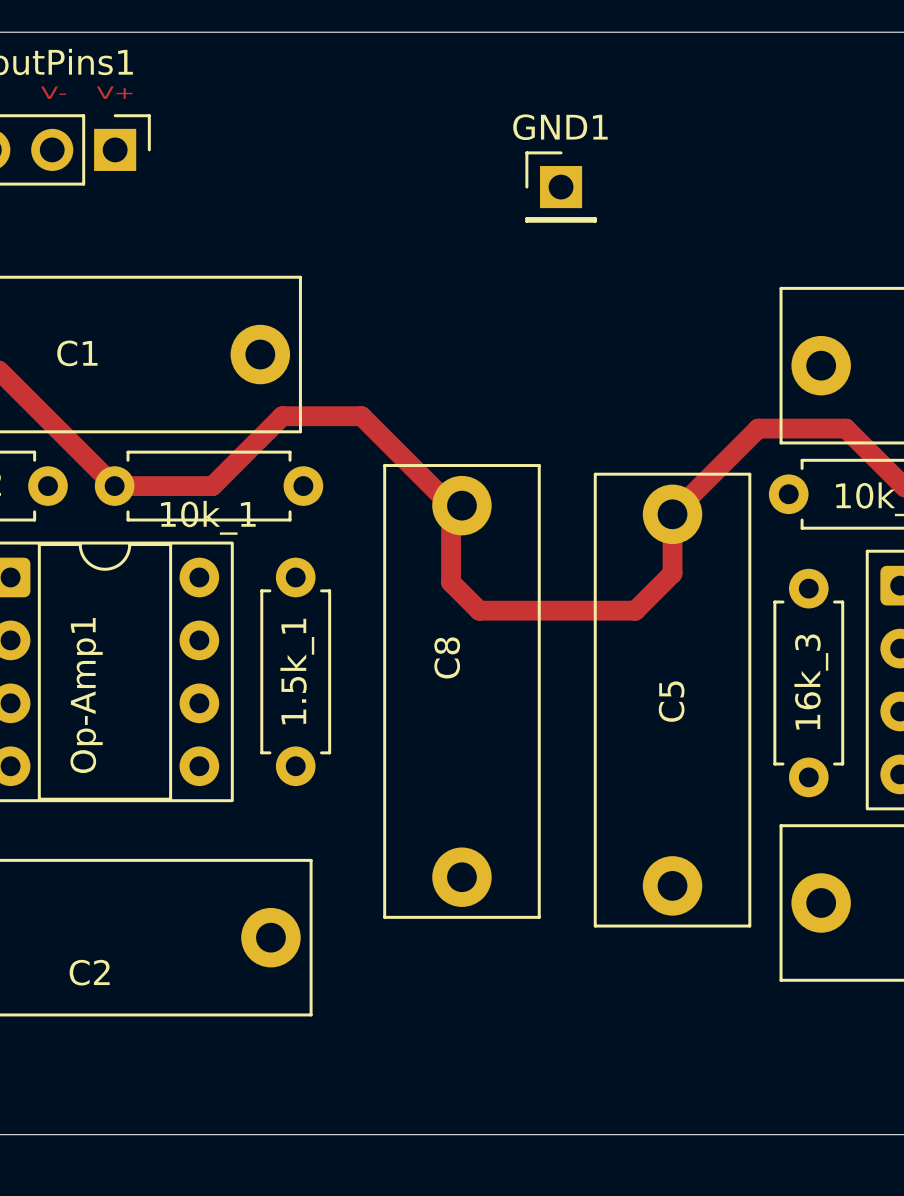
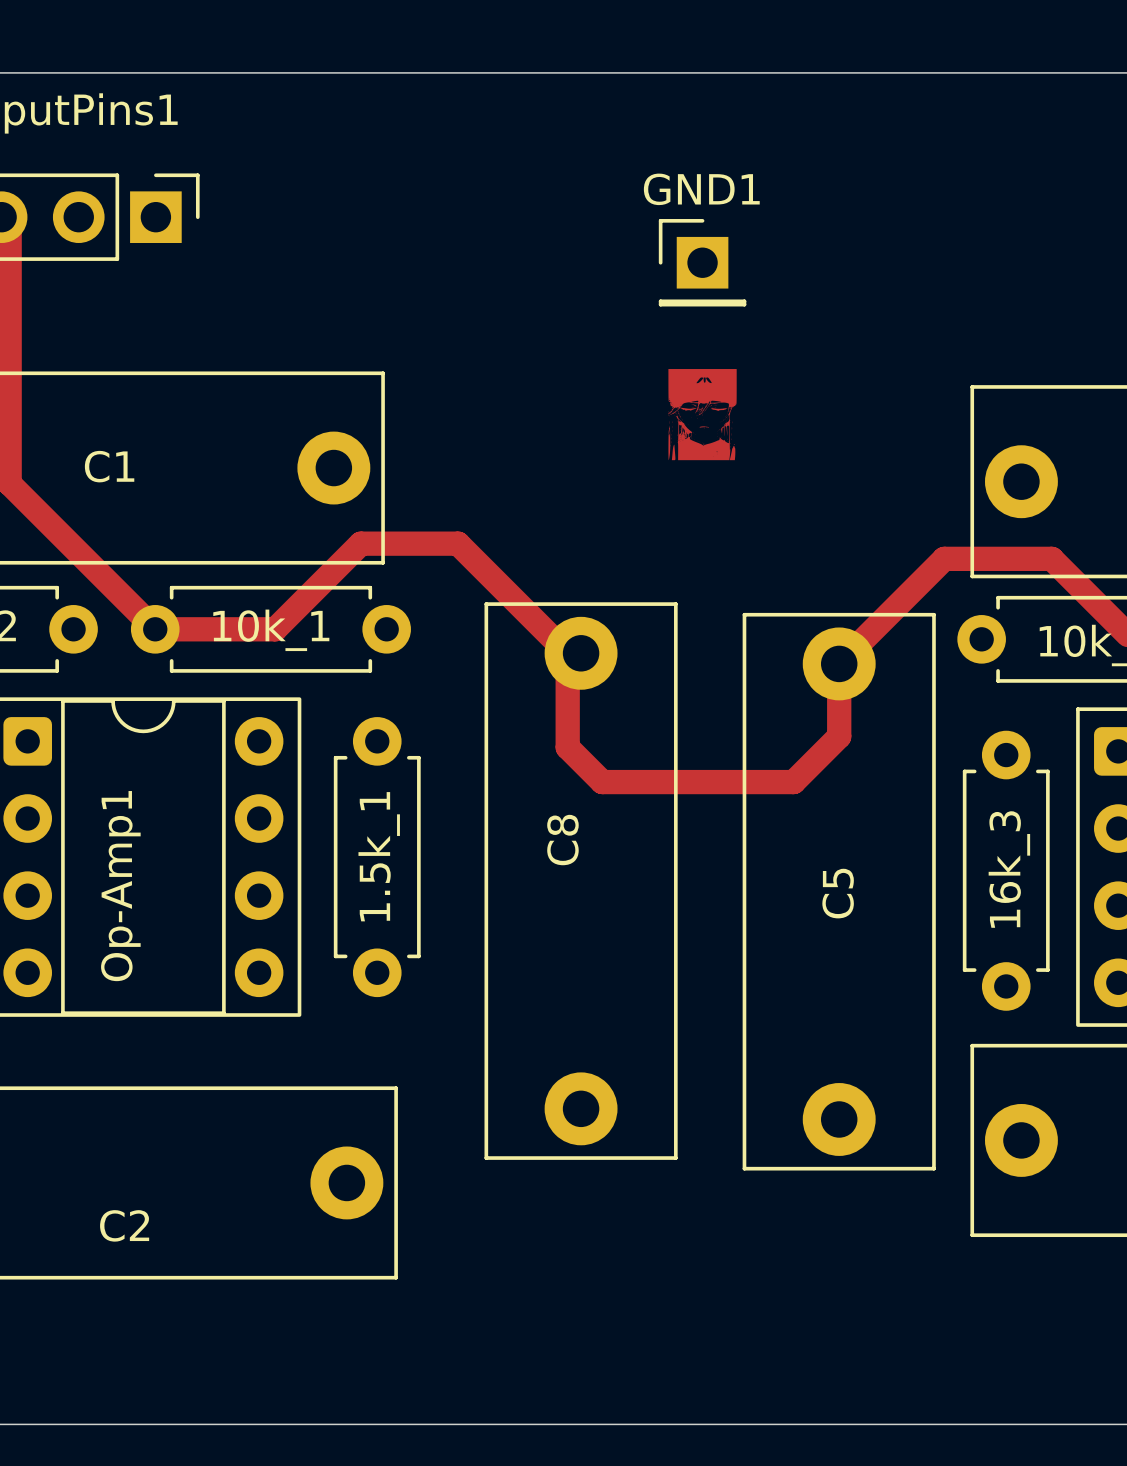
text: V- (53, 92) -> none
text: V+ (114, 92) -> none
drawing: none -> [668, 369, 737, 461]
10k_1 name position: 10k_1 (208, 517) -> 10k_1 (271, 630)

